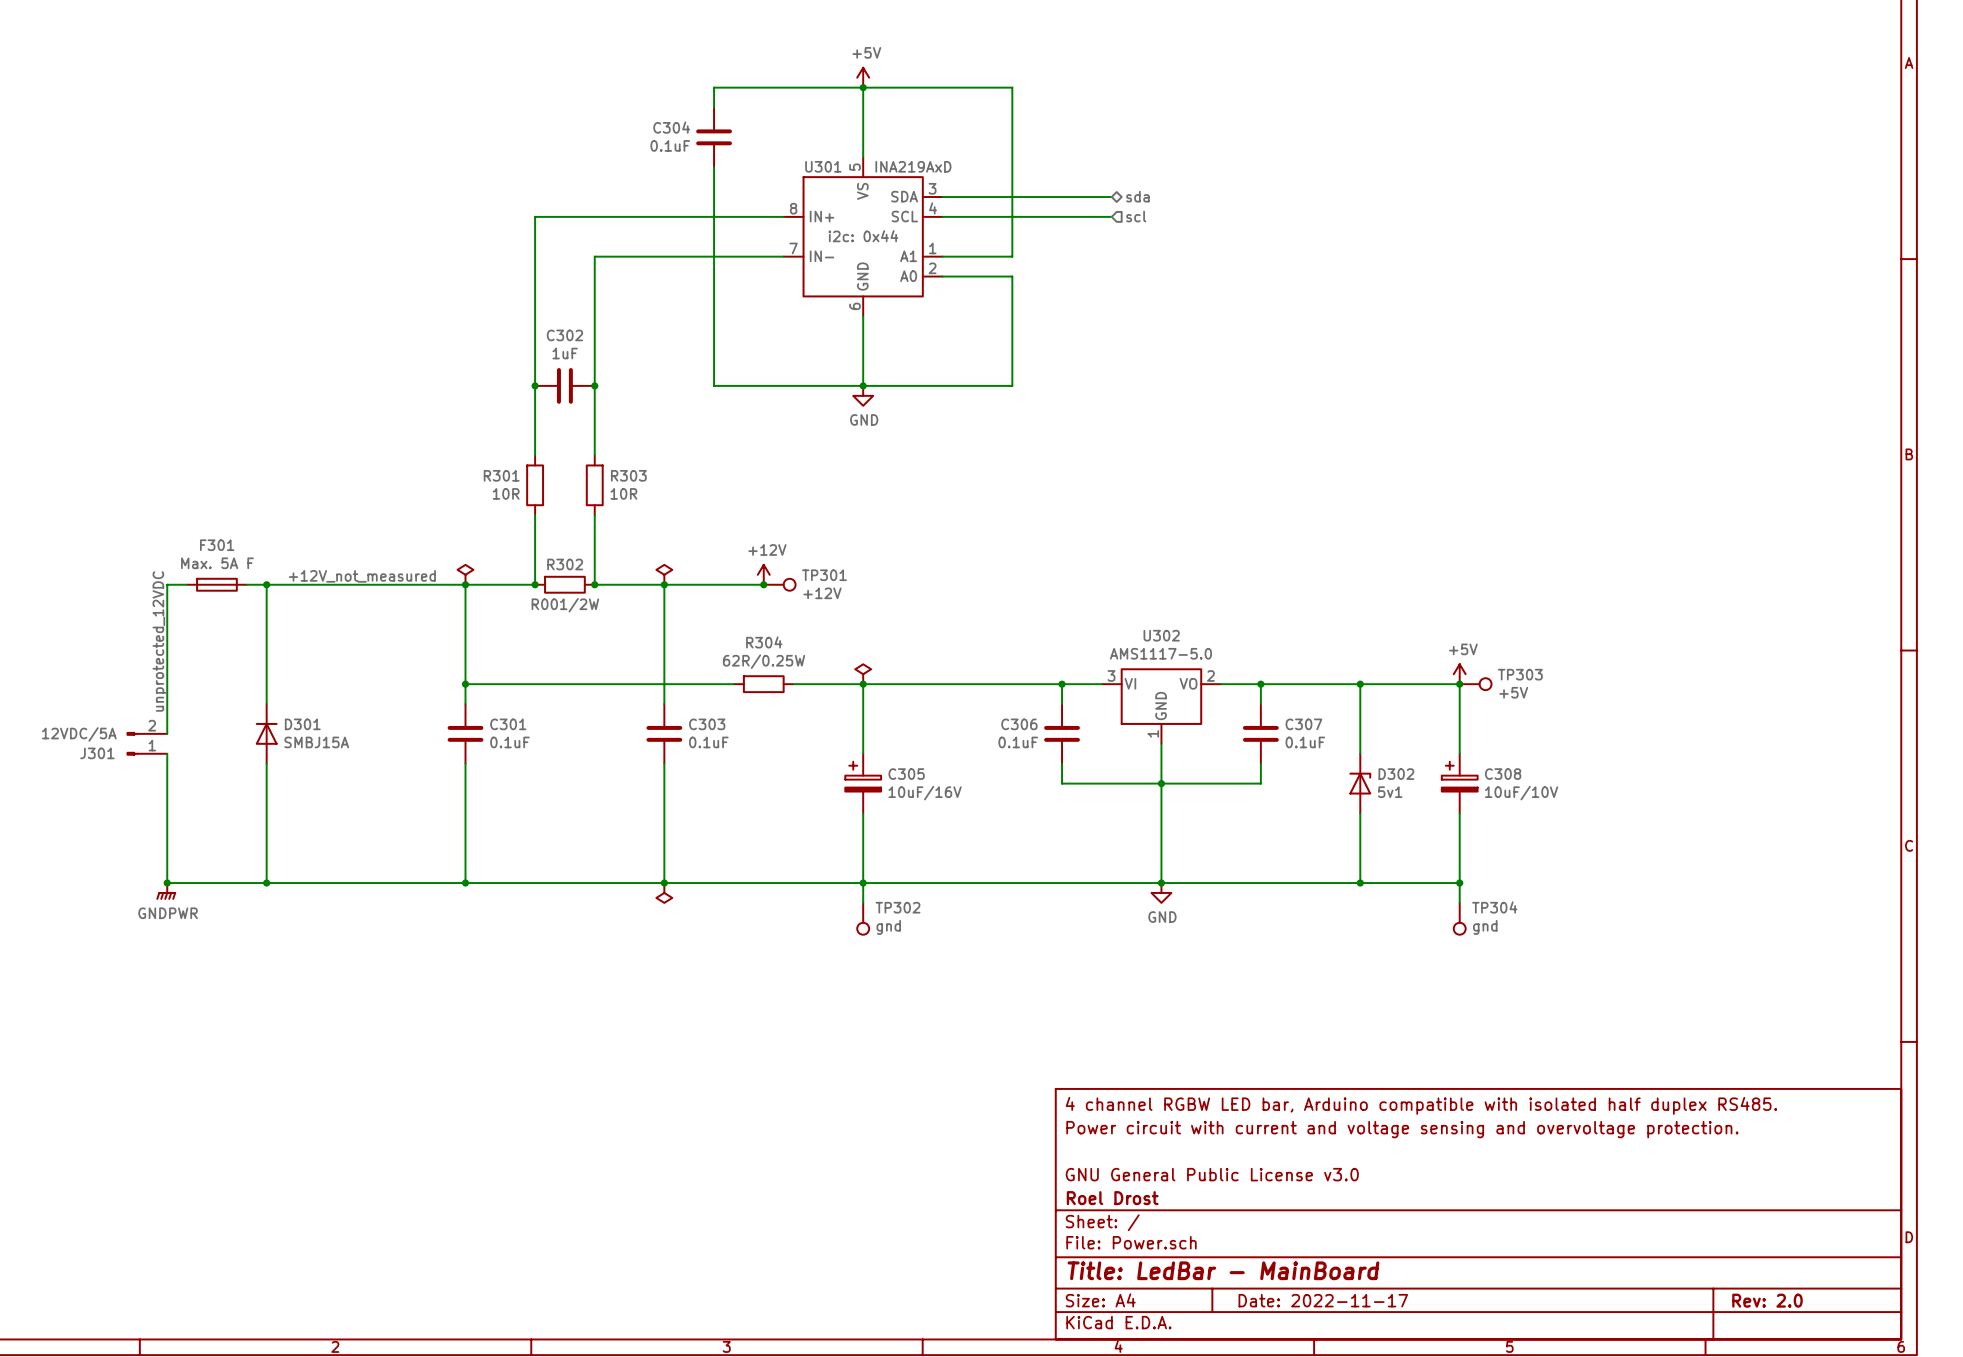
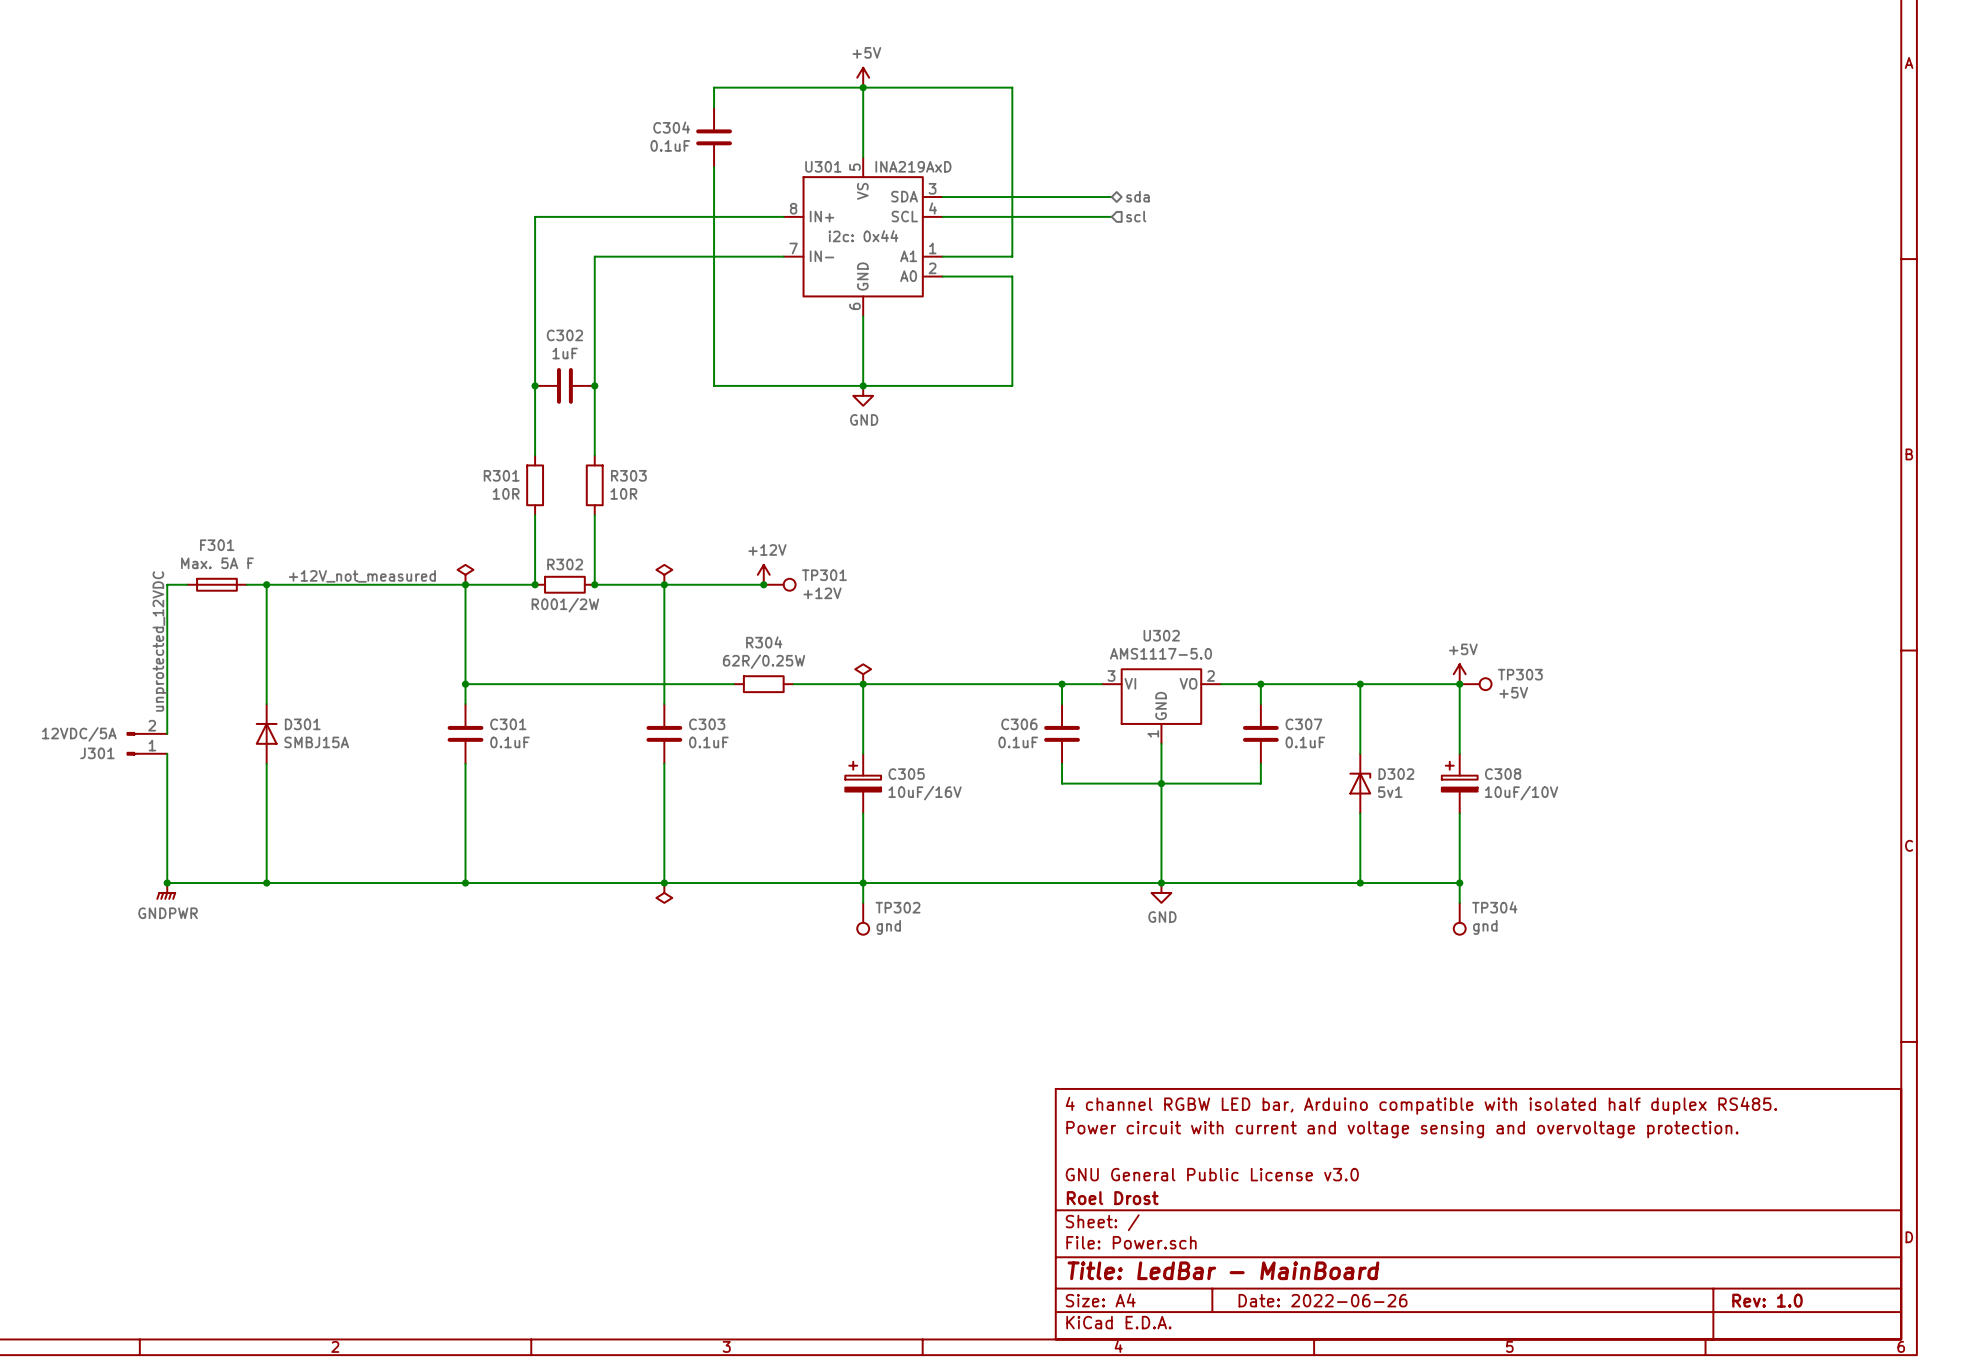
title block: Date: 2022-11-17 (1323, 1300) -> Date: 2022-06-26 (1323, 1300)
title block: Rev: 2.0 (1767, 1300) -> Rev: 1.0 (1767, 1300)

